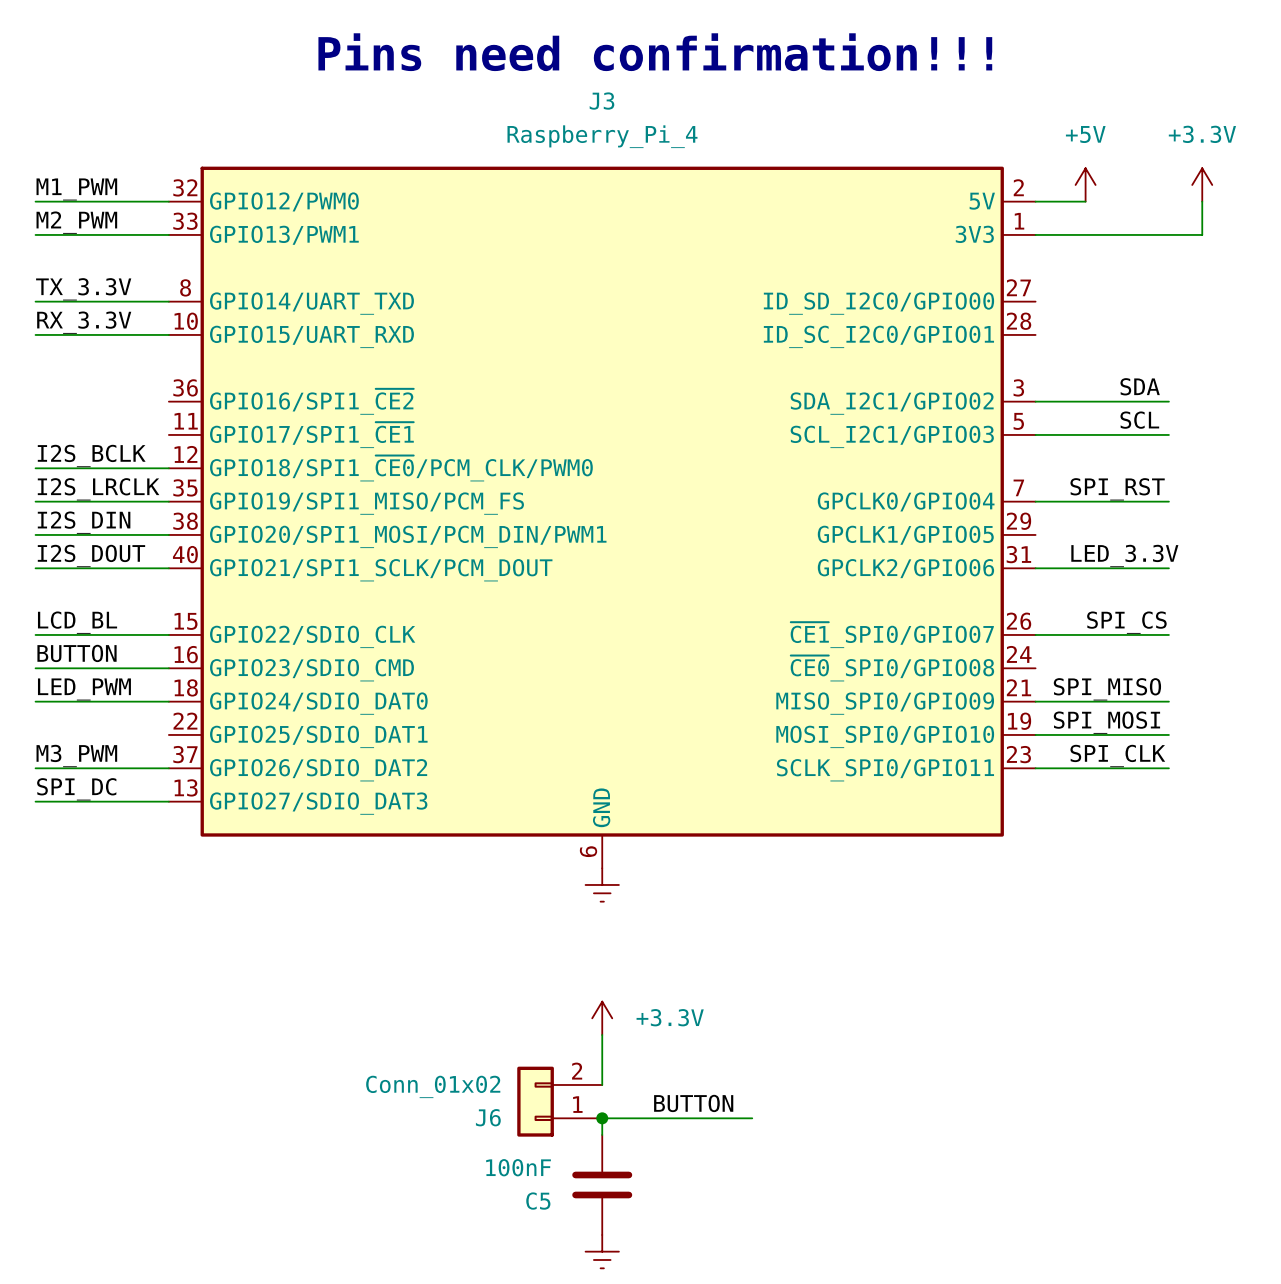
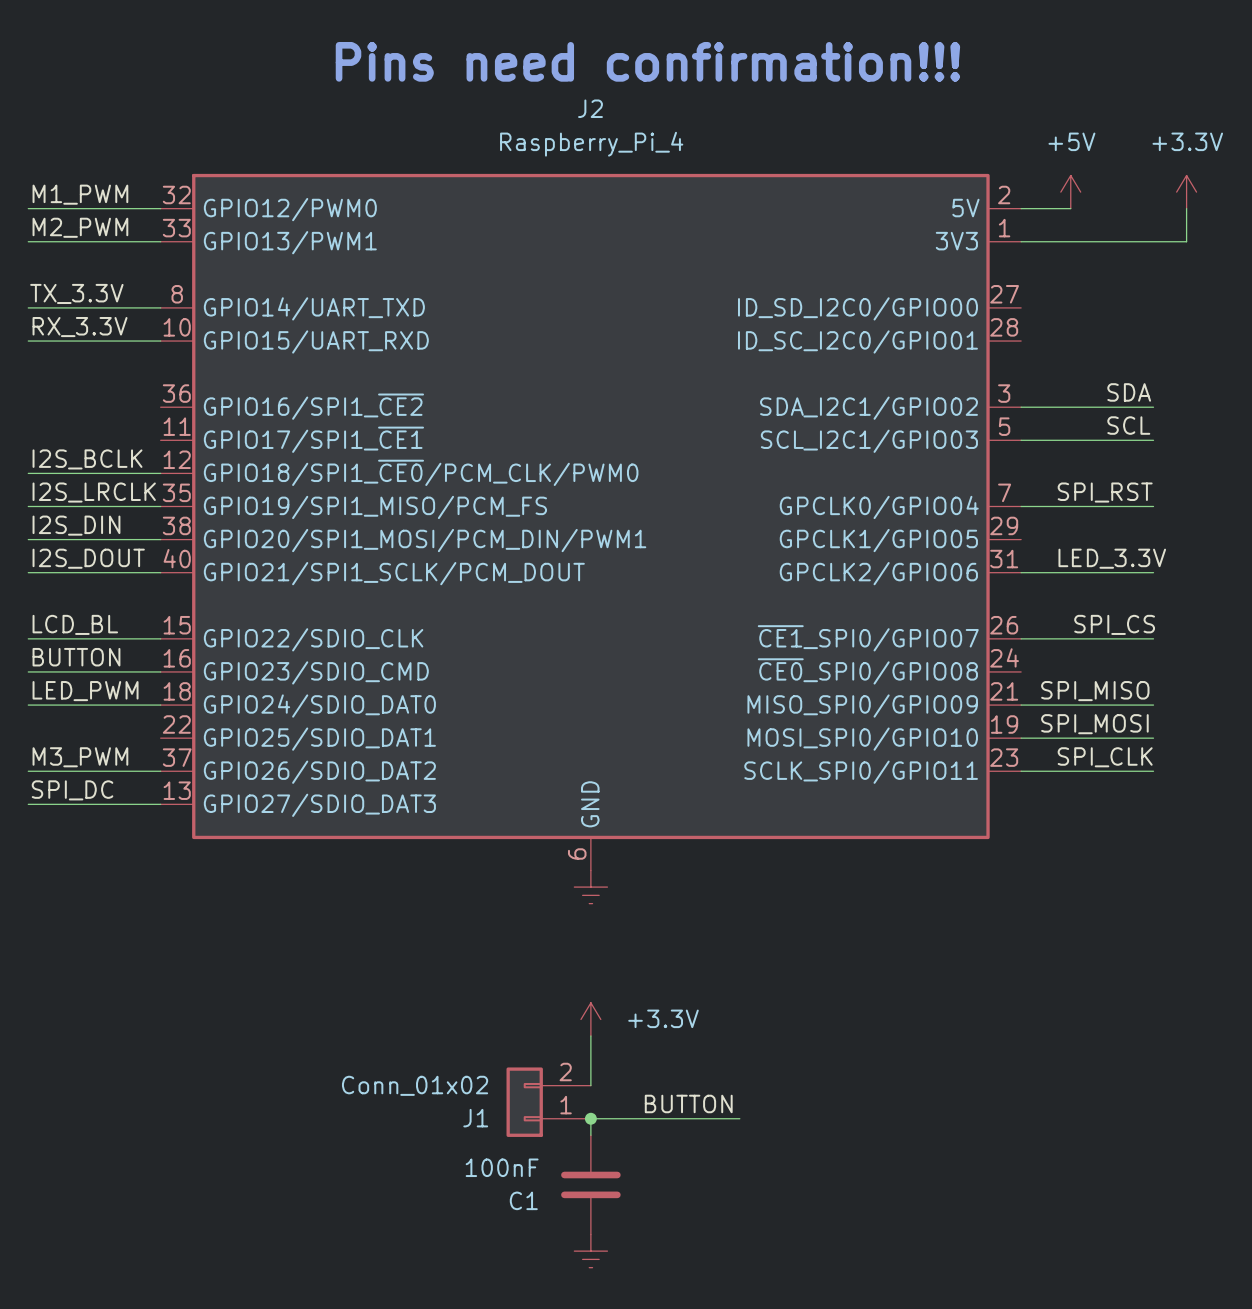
J3 name: J3 (601, 101) -> J2 (590, 108)
J6 name: J6 (488, 1117) -> J1 (475, 1118)
C5 name: C5 (538, 1201) -> C1 (523, 1200)

